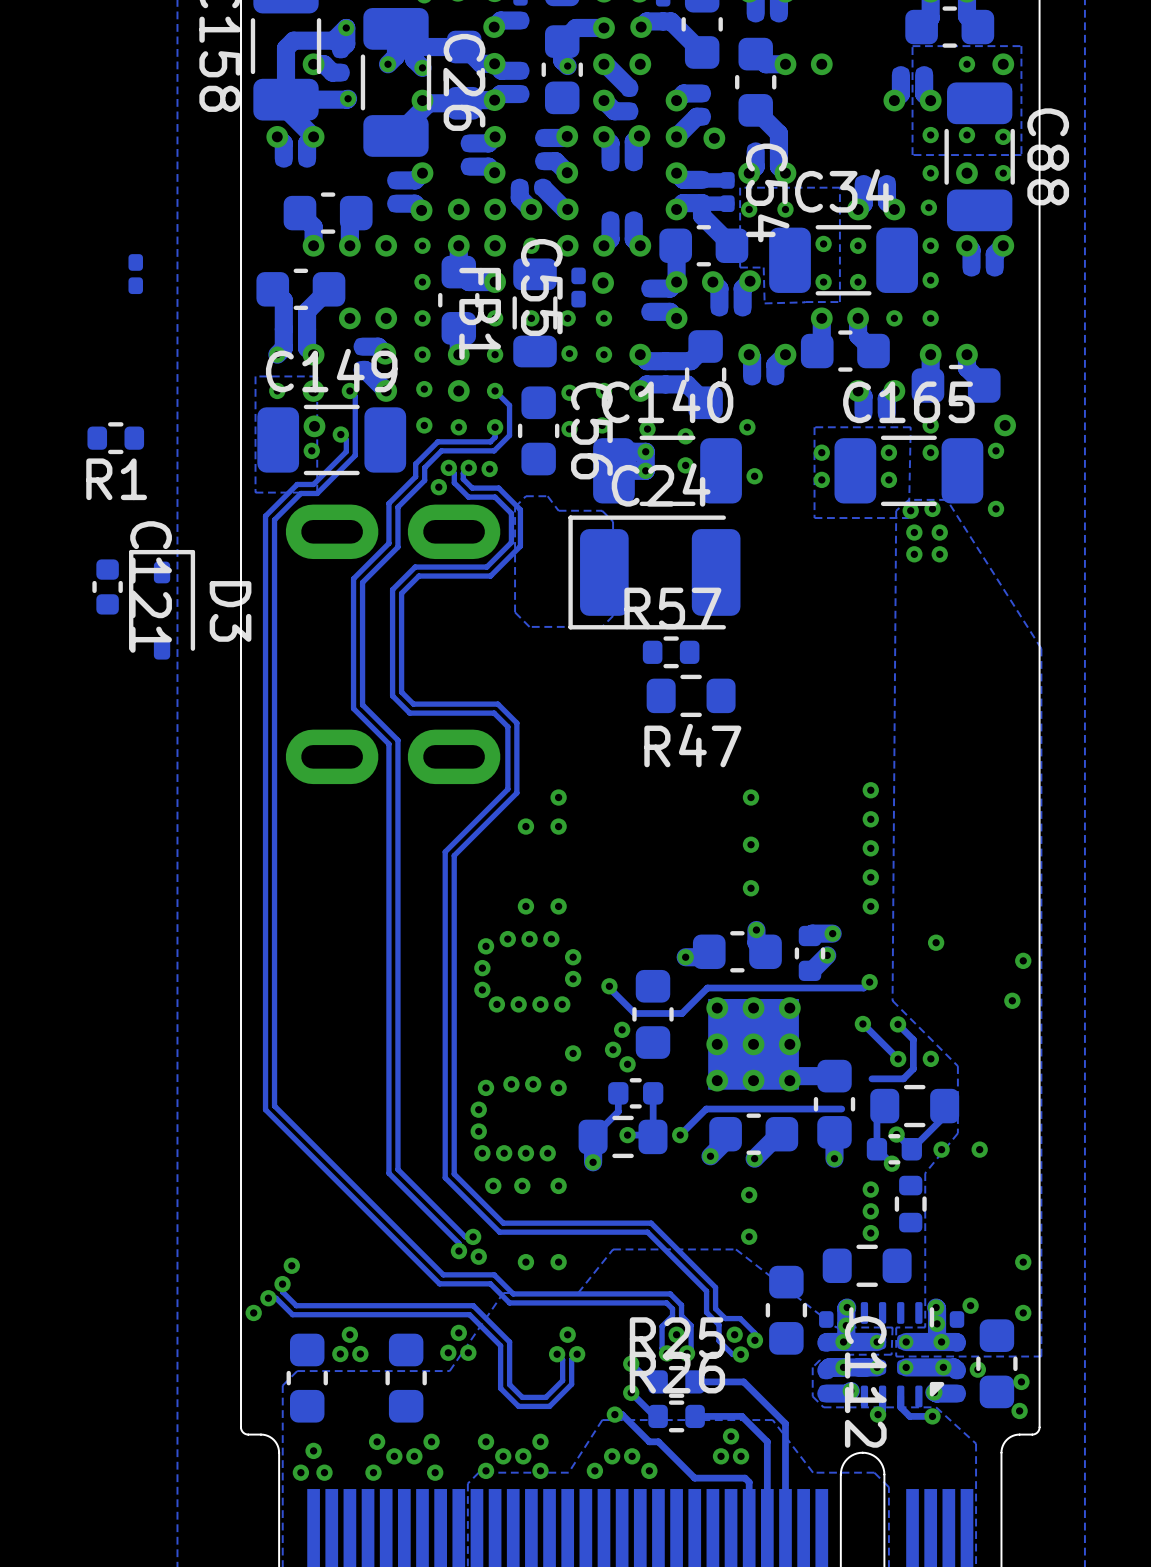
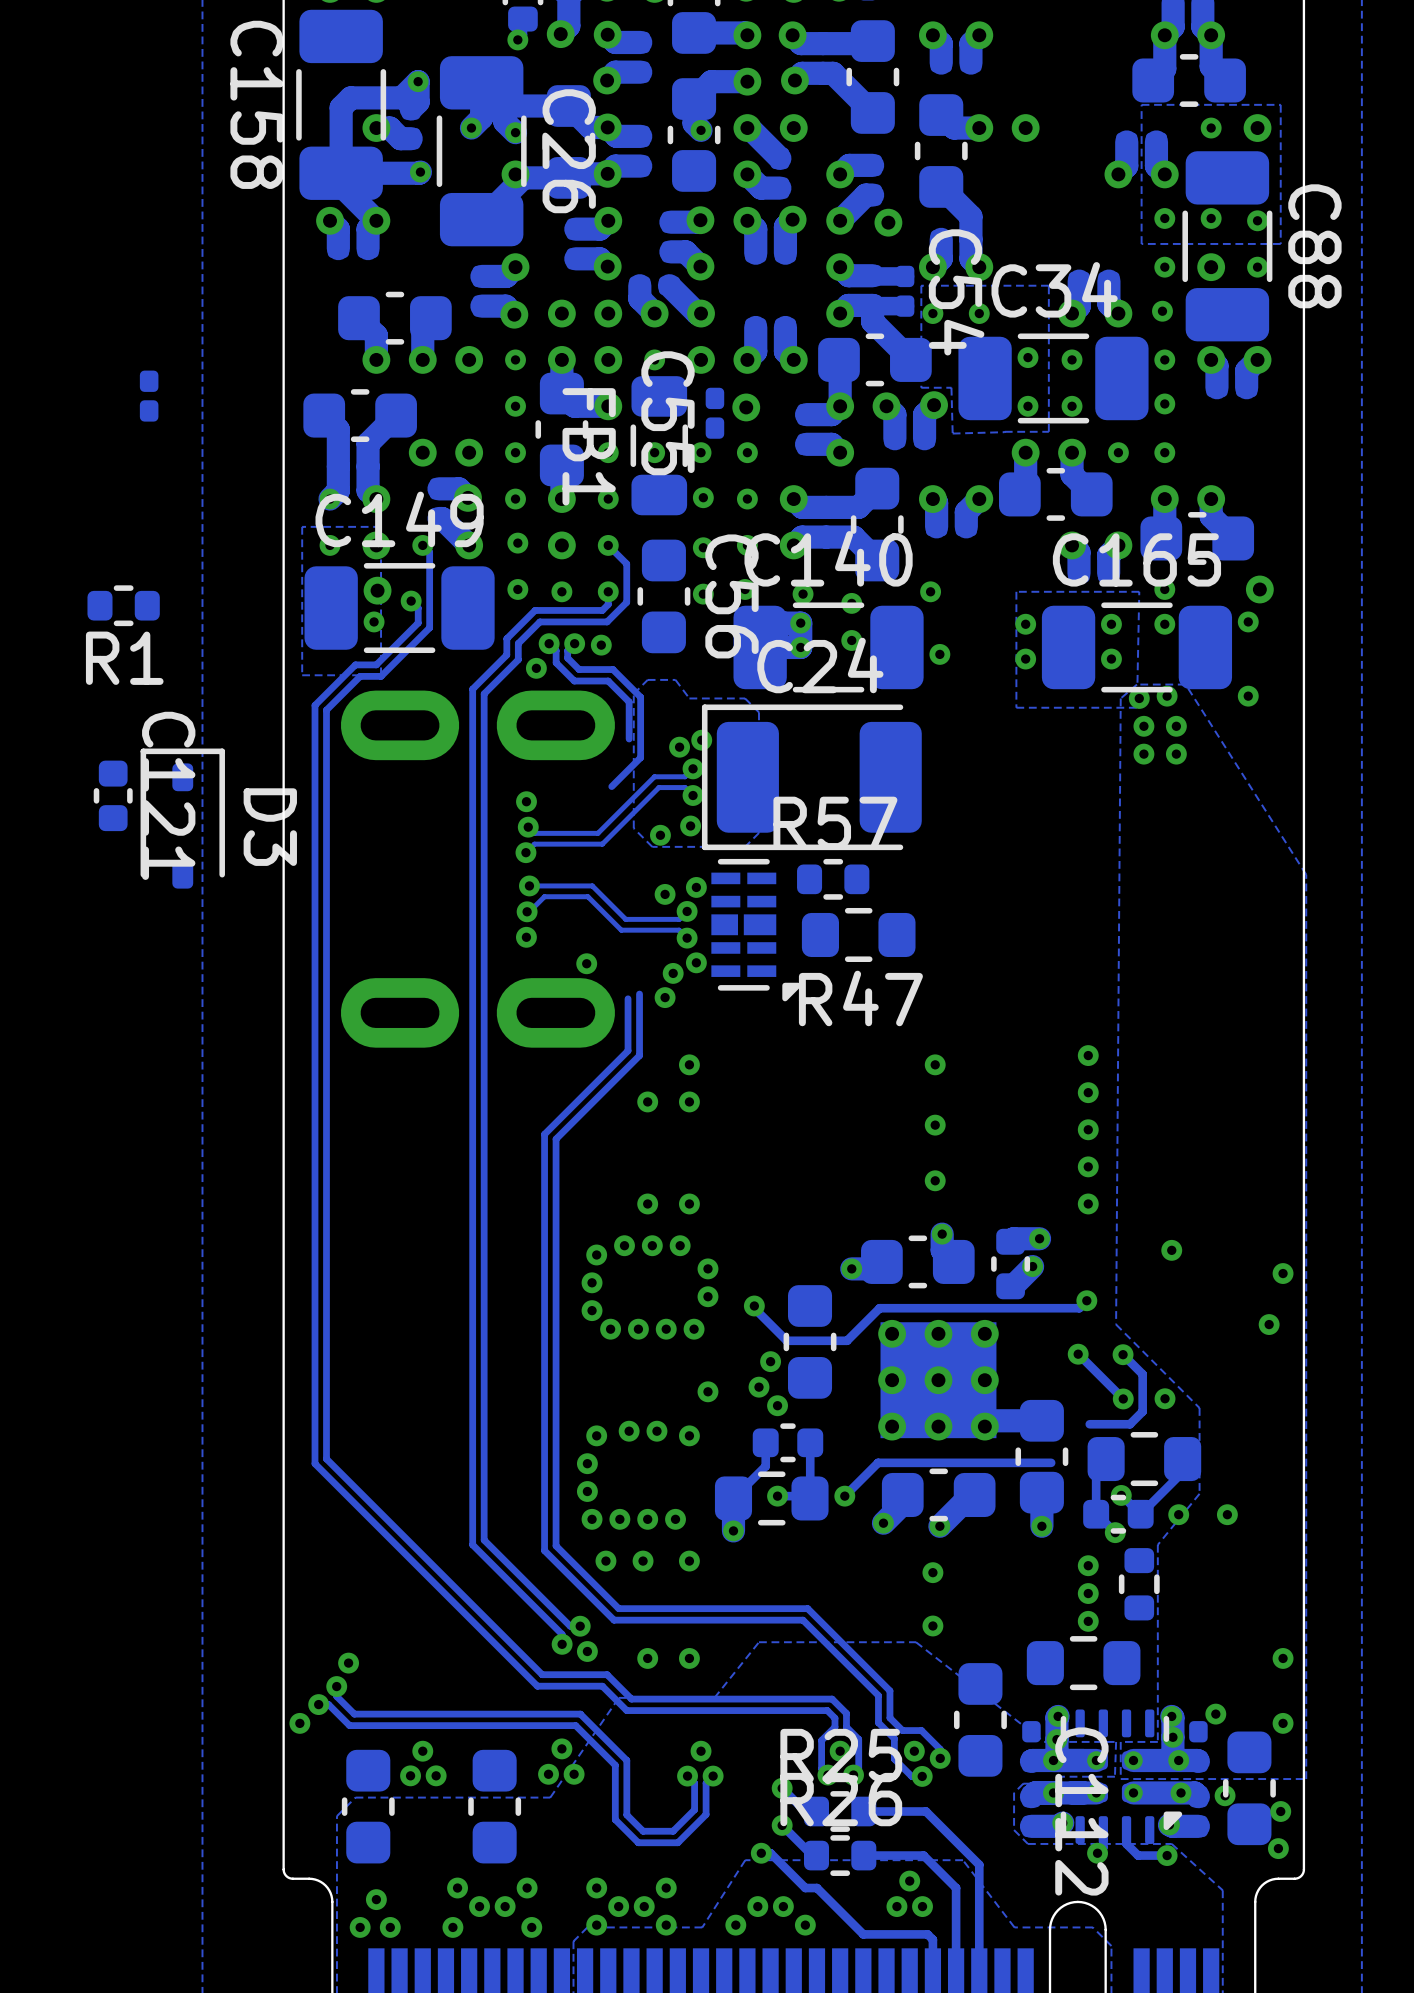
track: (511, 542) (486, 567) (415, 567) (392, 589) (392, 695) (409, 713) (494, 713) (507, 726) (507, 789) -> (628, 998) (628, 1050) (624, 1054)
track: (388, 543) (353, 578) (353, 708) (388, 744) -> (472, 740) (472, 996)
via: none -> (701, 740)
track: (520, 546) (490, 576) (418, 576) (401, 593) (401, 692) (413, 704) (497, 704) (516, 723) (516, 792) -> (639, 994) (639, 1055) (636, 1059)
track: none -> (640, 743) (640, 757) (611, 786)
track: (397, 547) (362, 582) (362, 704) (397, 740) -> (484, 744) (484, 991)
via: none -> (679, 747)
track: none -> (693, 768) (685, 776) (654, 776) (597, 833) (534, 833) (528, 827)
via: none -> (693, 768)
track: none -> (693, 795) (685, 787) (658, 787) (602, 844) (534, 844) (525, 852)
via: none -> (693, 795)
via: none -> (526, 801)
via: none -> (690, 826)
via: none -> (528, 827)
via: none -> (660, 835)
via: none -> (525, 852)
track: none -> (529, 885) (592, 885) (625, 919) (679, 919) (687, 911)
via: none -> (529, 885)
via: none -> (696, 887)
via: none -> (665, 894)
track: none -> (527, 911) (529, 911) (544, 896) (587, 896) (621, 930) (679, 930) (687, 938)
via: none -> (527, 911)
via: none -> (687, 911)
part: none -> (756, 930)
via: none -> (526, 937)
via: none -> (687, 938)
via: none -> (696, 962)
via: none -> (586, 963)
via: none -> (673, 973)
via: none -> (665, 997)

